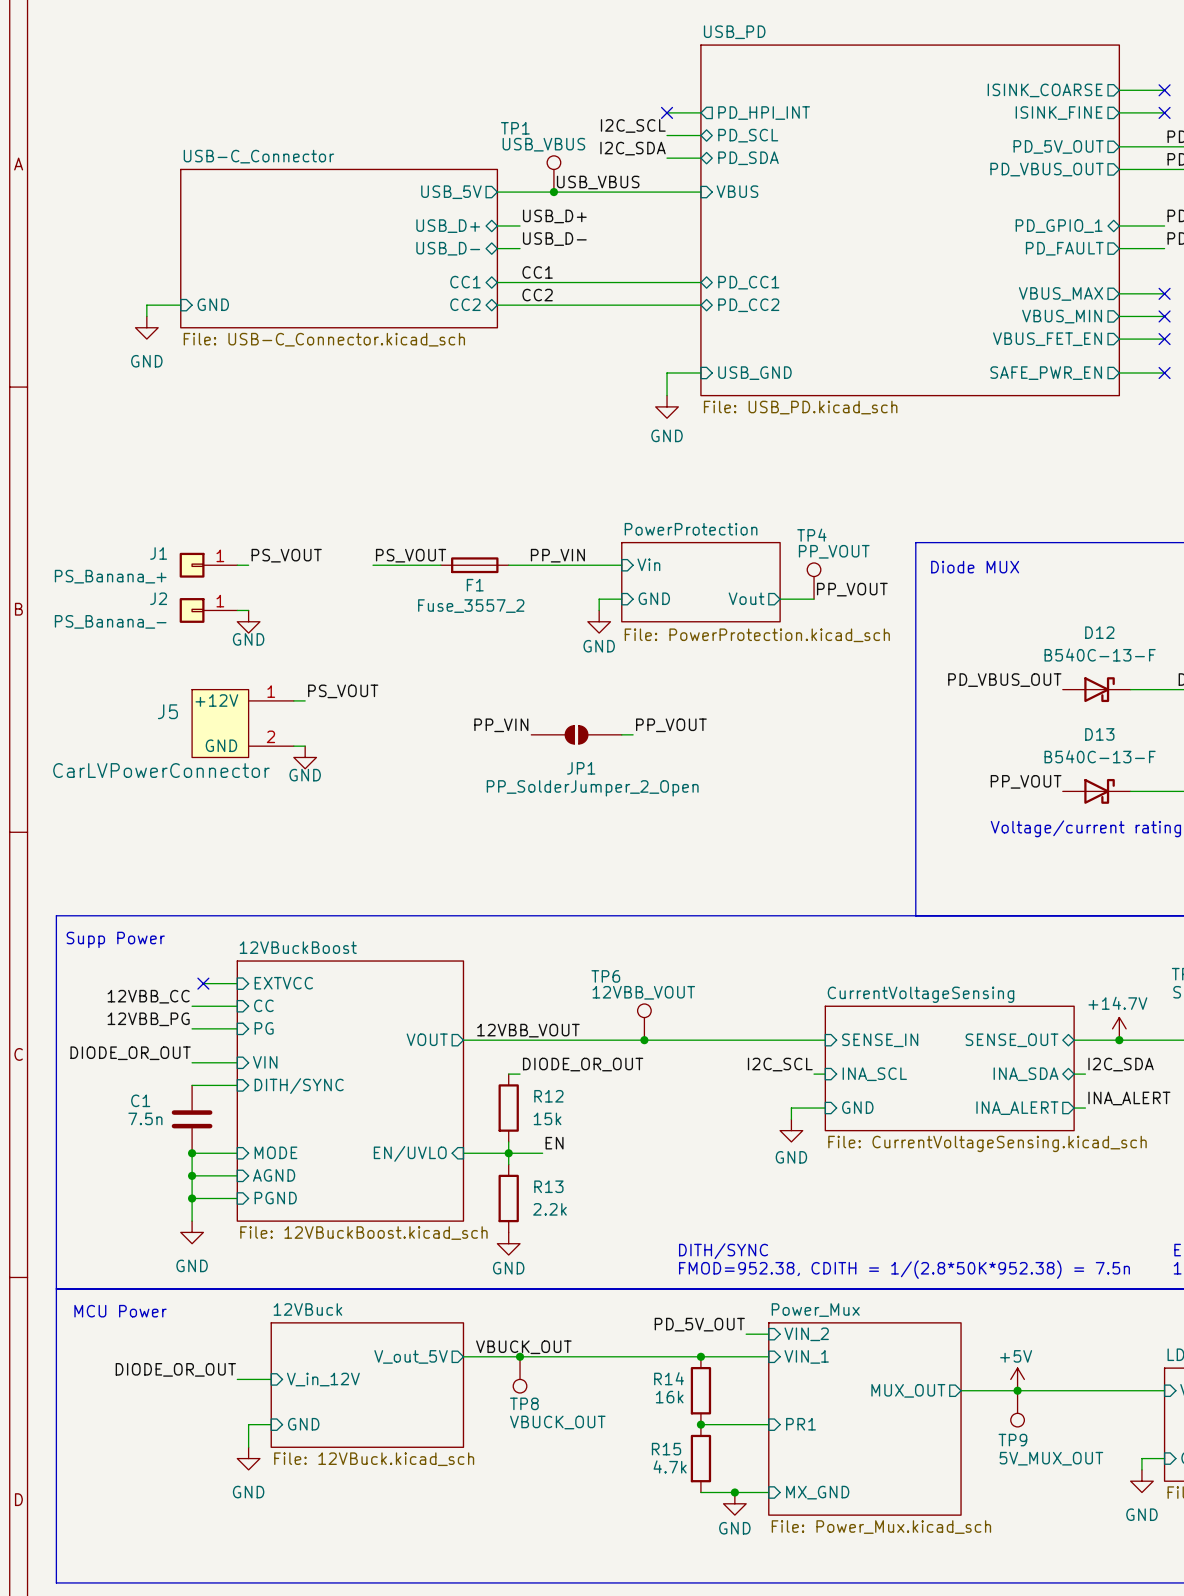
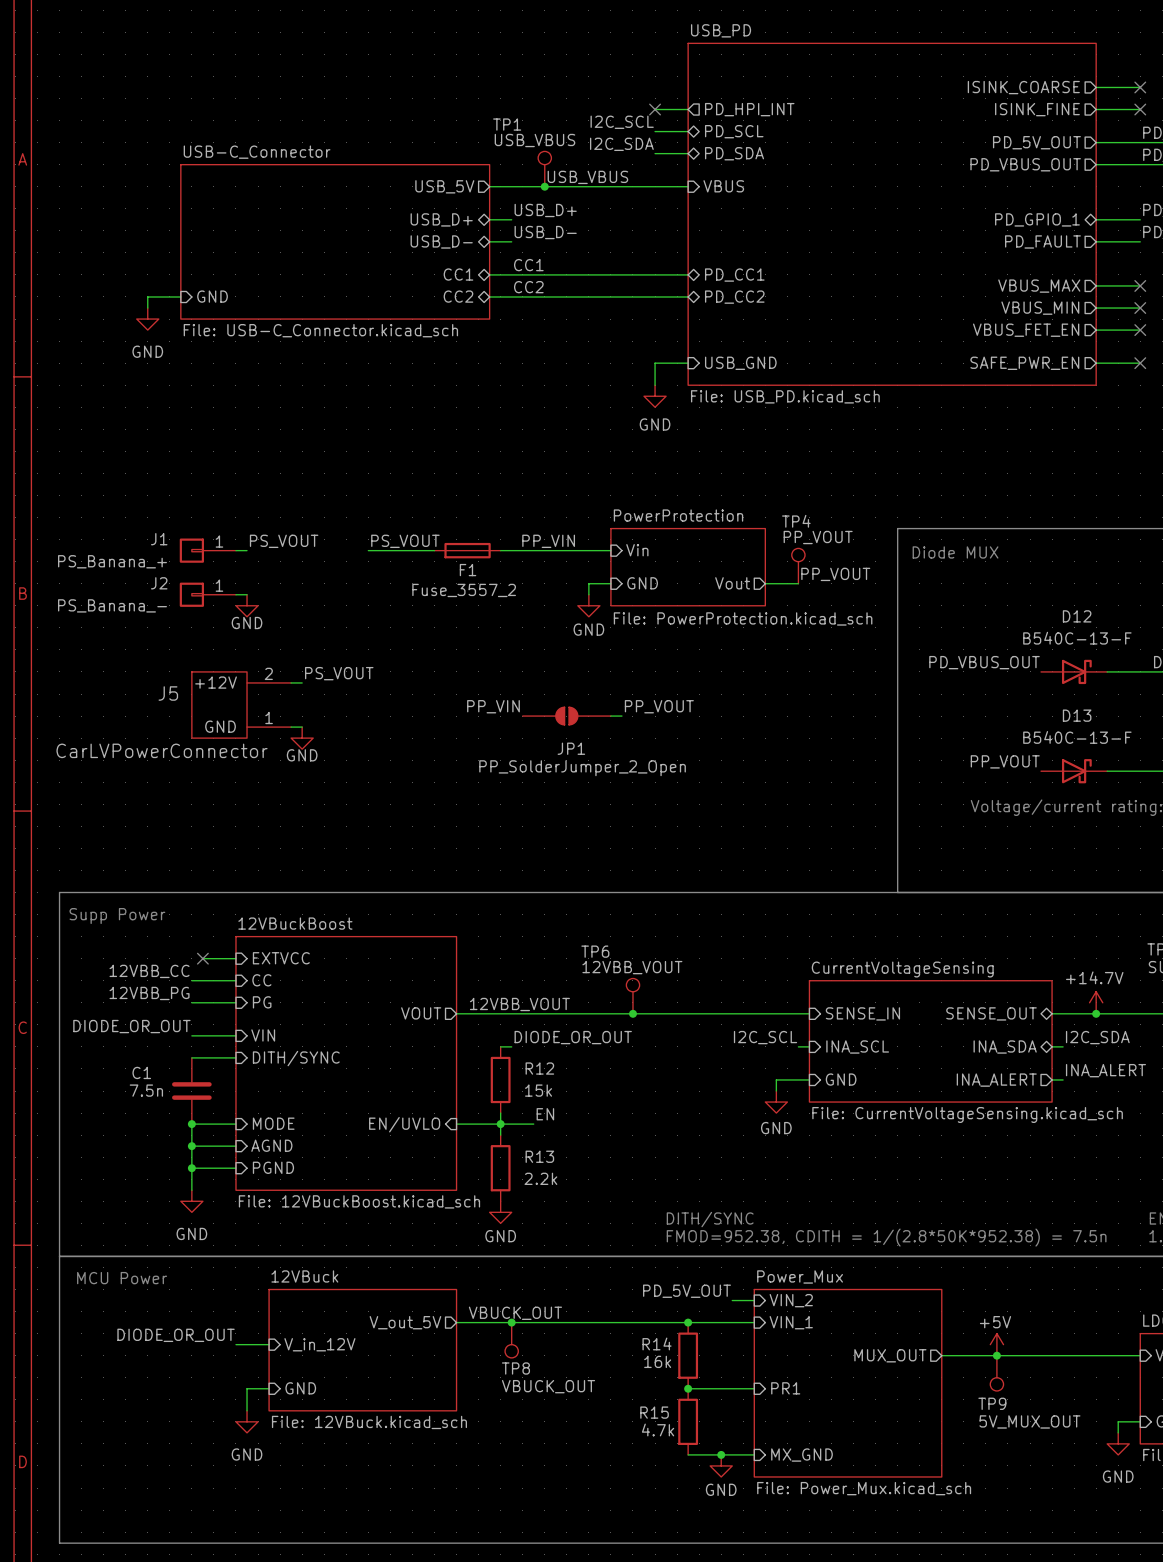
J5 pin number: 1 (271, 691) -> 2 (268, 673)
J5 pin number: 2 (270, 736) -> 1 (269, 717)

